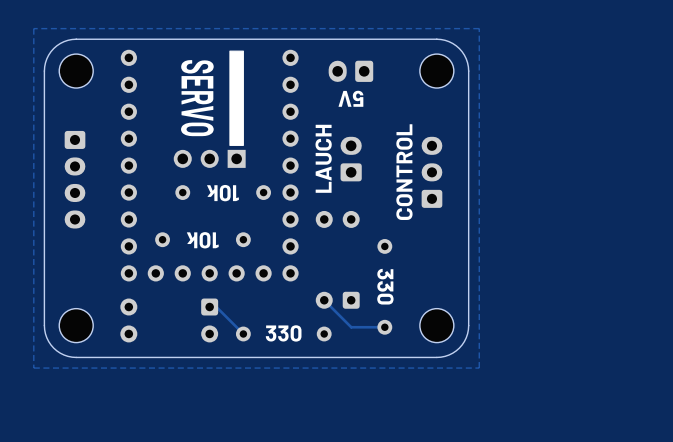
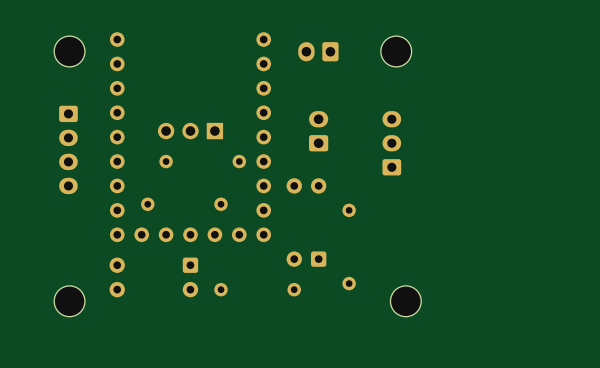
zone outline: (479, 28) (33, 28) (33, 368) (479, 368) (479, 28) -> none
board edge: (436, 39) (76, 39) (67, 40) (56, 45) (48, 55) (44, 71) (44, 325) (45, 333) (50, 344) (64, 355) (76, 357) (436, 357) (449, 355) (456, 350) (466, 337) (468, 325) (468, 71) (466, 58) (459, 48) (449, 41) (436, 39) -> none
drawing: [229, 50, 244, 146] -> none
text: SERVO (197, 98) -> none
text: 5V (350, 98) -> none
text: LAUCH (323, 158) -> none
text: CONTROL (404, 172) -> none
text: 10k (223, 193) -> none
text: 10k (202, 240) -> none
text: 330 (385, 286) -> none
track: (324, 300) (351, 327) (384, 327) -> none
track: (209, 307) (216, 307) (243, 334) -> none
part position: (76, 325) -> (69, 301)
part position: (436, 325) -> (405, 301)
text: 330 (283, 333) -> none

